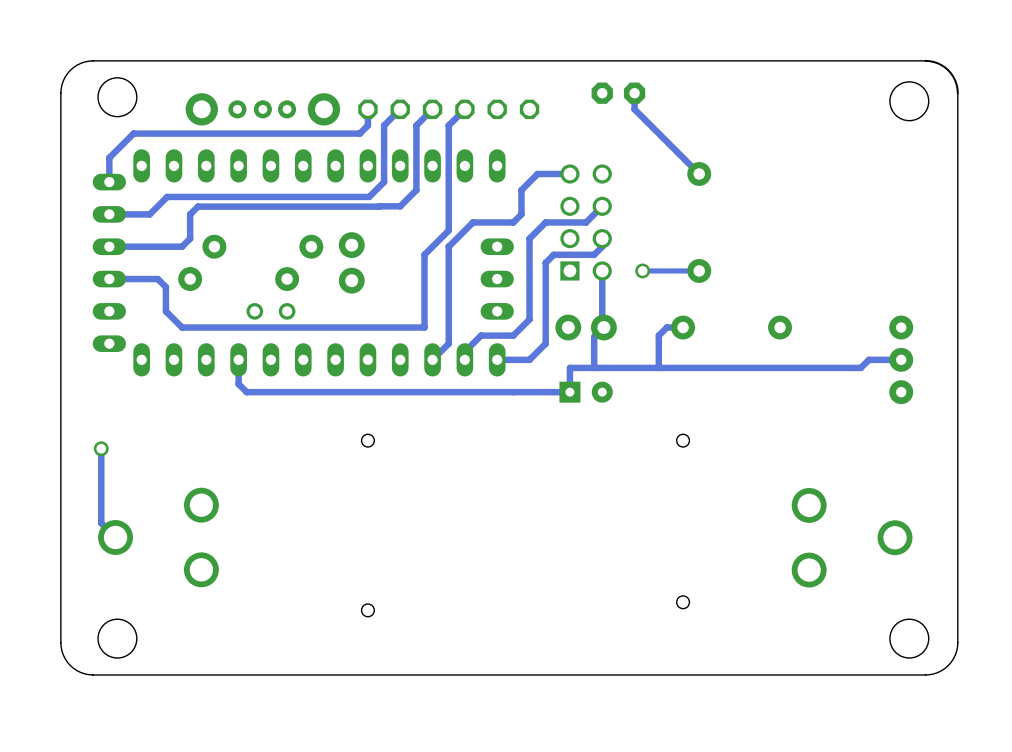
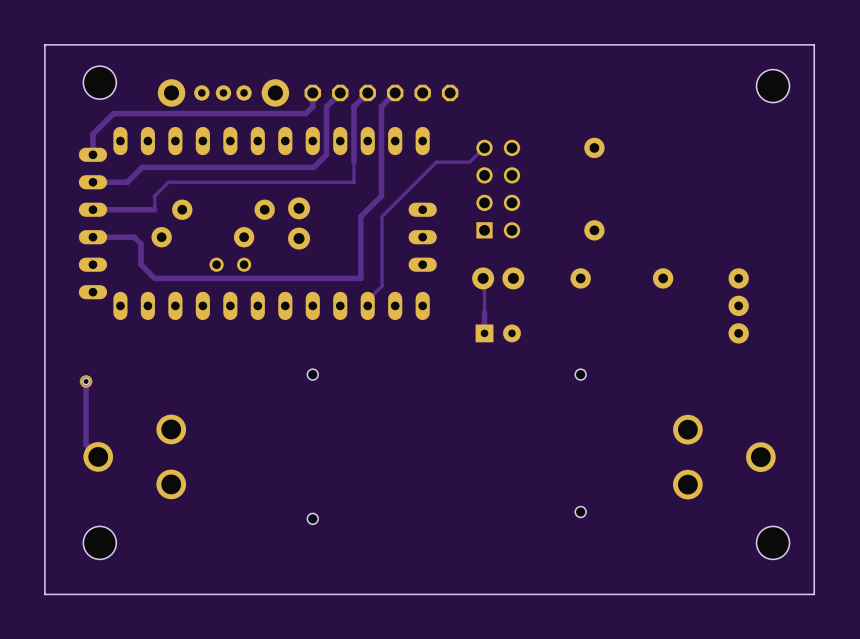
part: (618, 93) -> none
track: (634, 93) (634, 109) (699, 173) -> none
board edge: (957, 93) (955, 80) (948, 70) (937, 63) (925, 60) (93, 60) (80, 63) (70, 70) (63, 80) (60, 93) (60, 642) (65, 658) (77, 670) (93, 674) (925, 674) (937, 672) (948, 665) (955, 655) (957, 642) -> (814, 79) (814, 44) (44, 44) (44, 594) (814, 594) (814, 546)
track: (569, 173) (537, 173) (521, 190) (521, 214) (513, 222) (472, 222) (448, 246) (448, 343) (432, 359) -> (484, 147) (481, 153) (478, 153) (469, 162) (436, 162) (382, 216) (382, 286) (369, 298) (369, 304) (367, 305)
track: (416, 190) (400, 206) (197, 206) (190, 214) (190, 238) (182, 246) -> (353, 161) (353, 182) (168, 182) (154, 196) (154, 209)
track: (602, 206) (586, 222) (545, 222) (529, 238) (529, 319) (513, 335) (481, 335) (464, 351) (464, 359) -> none
track: (602, 238) (602, 246) (594, 254) (553, 254) (545, 262) (545, 343) (529, 359) (497, 359) -> none
track: (602, 270) (602, 325) (603, 327) (594, 337) (594, 367) -> none
via: (642, 270) -> none
track: (699, 270) (642, 270) -> none
track: (683, 327) (666, 327) (658, 335) (658, 367) -> none
track: (238, 359) (238, 384) (246, 392) (569, 392) -> none
track: (901, 359) (868, 359) (860, 367) (569, 367) -> (483, 285) (484, 312)
part position: (901, 359) -> (738, 305)
hole: none -> (86, 381)

